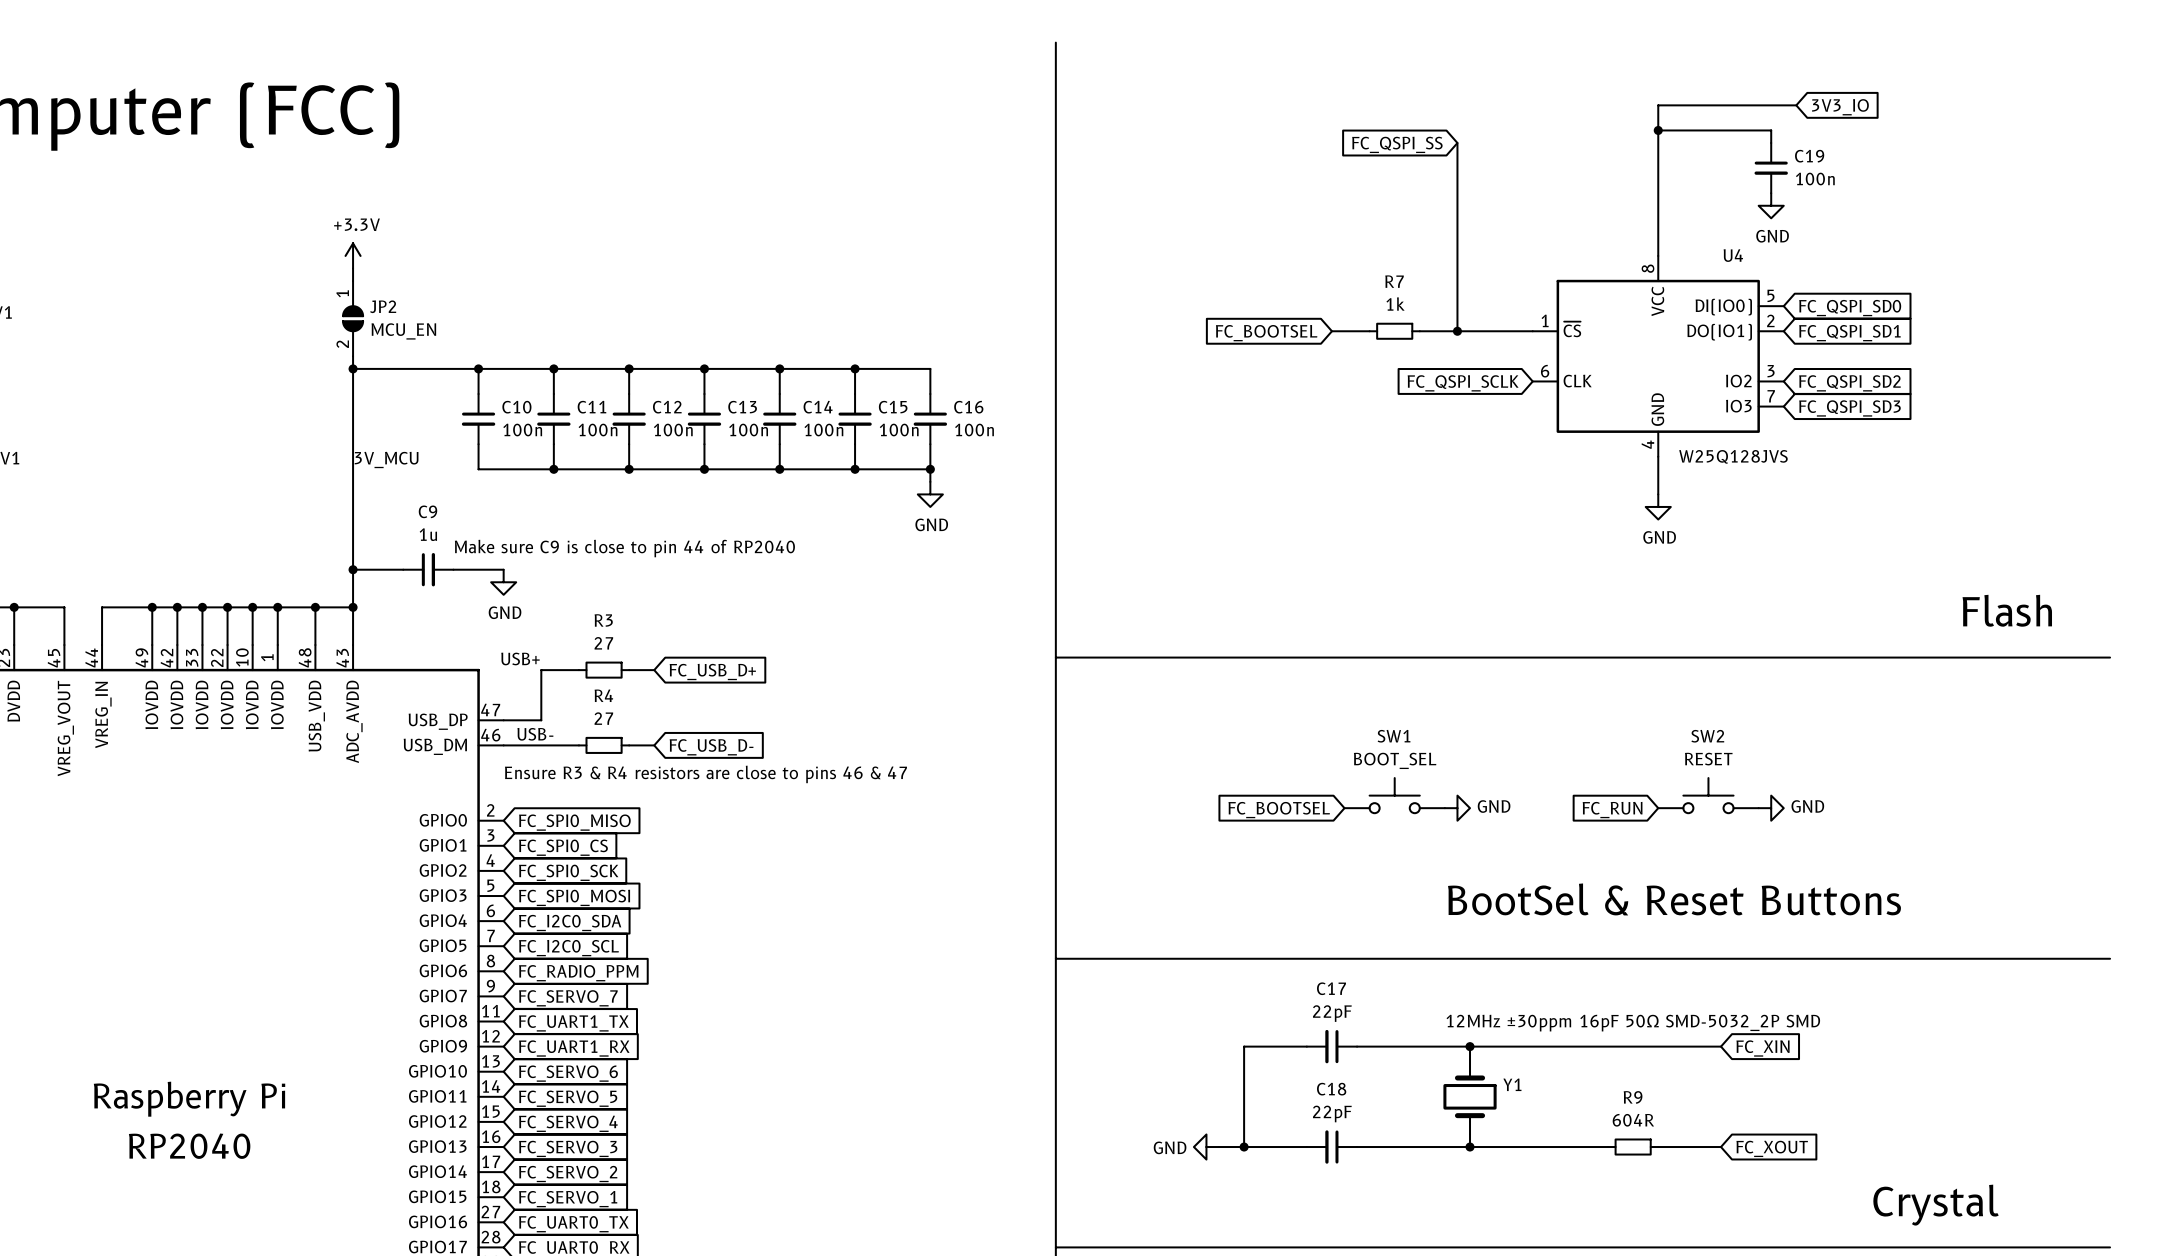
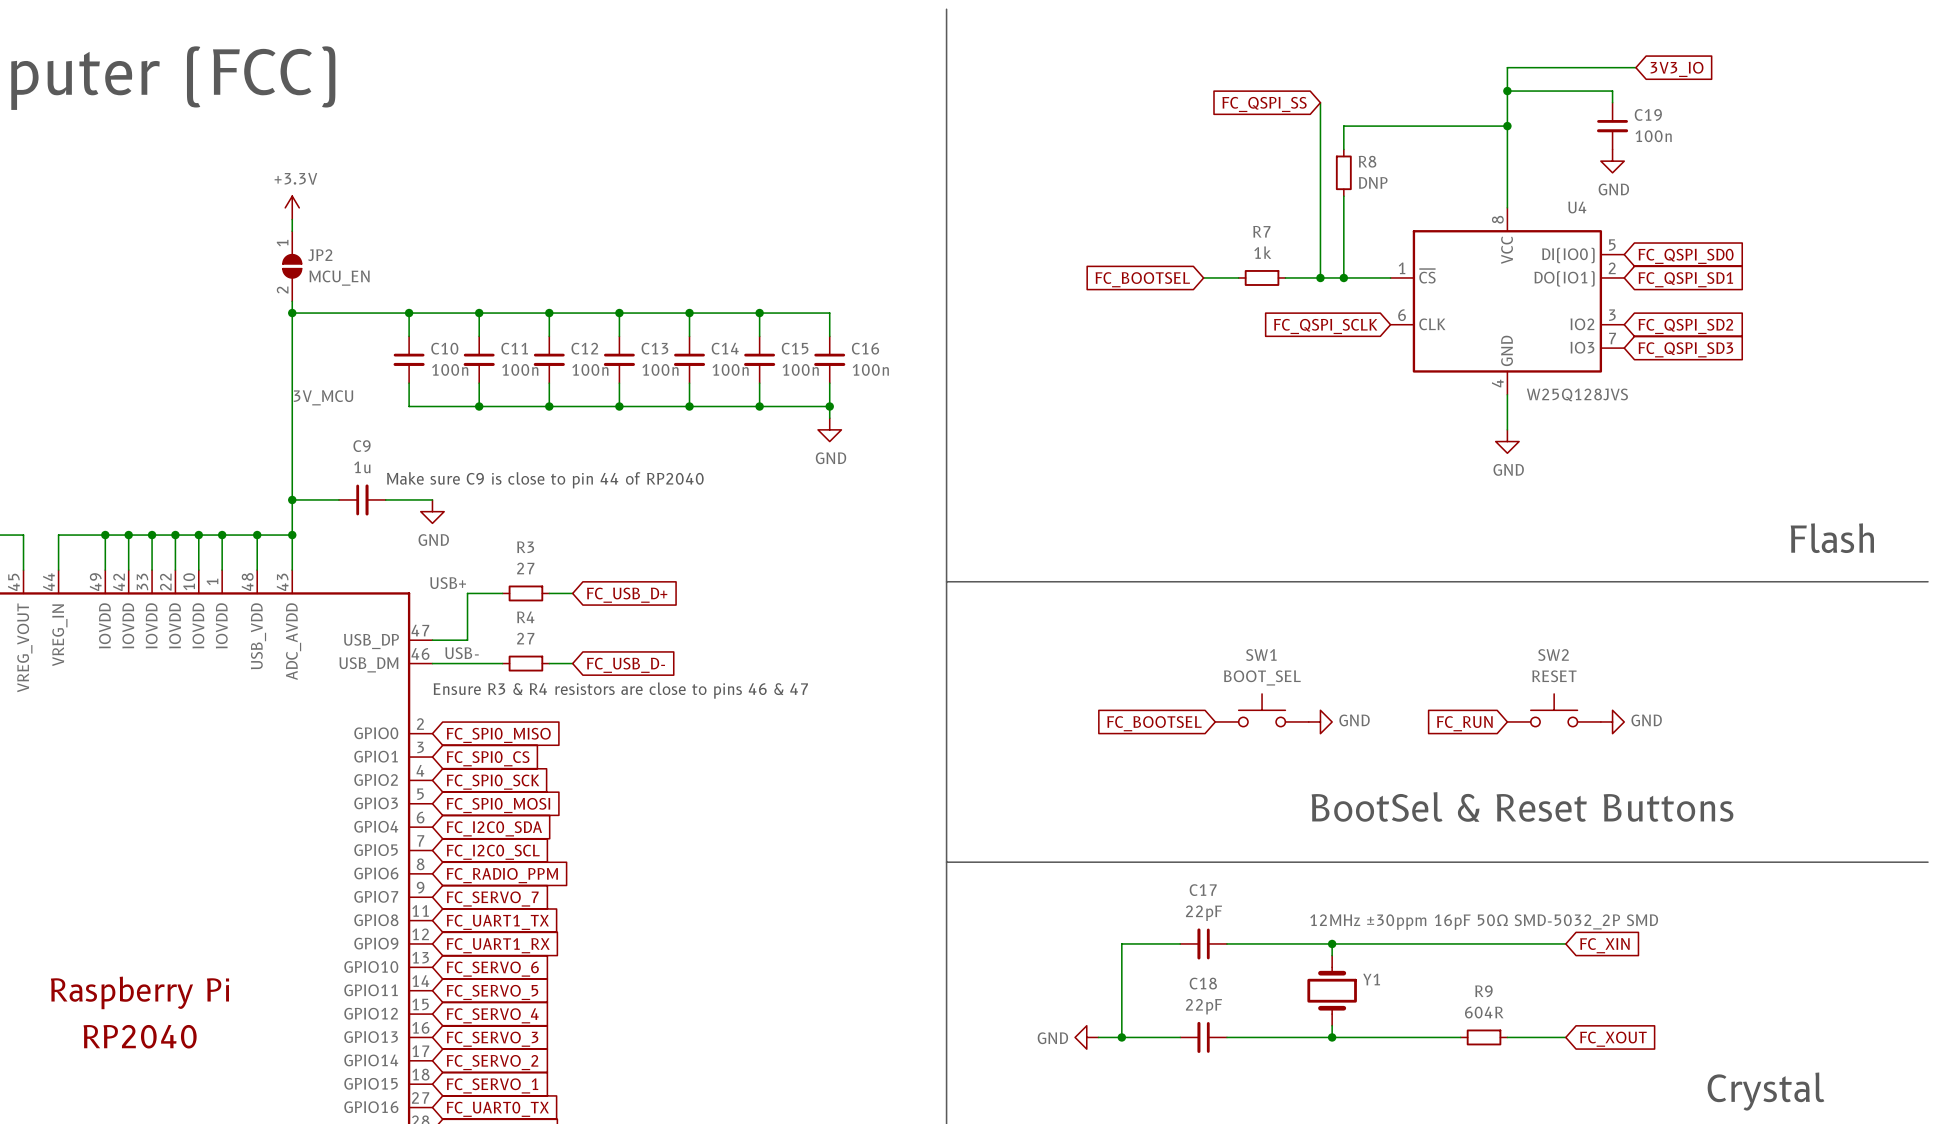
wire: none -> (1507, 126) (1343, 126) (1343, 149)
junction: none -> (1507, 126)
R8: none -> DNP (1343, 172)
wire: none -> (1343, 196) (1343, 277)
junction: none -> (1343, 277)

